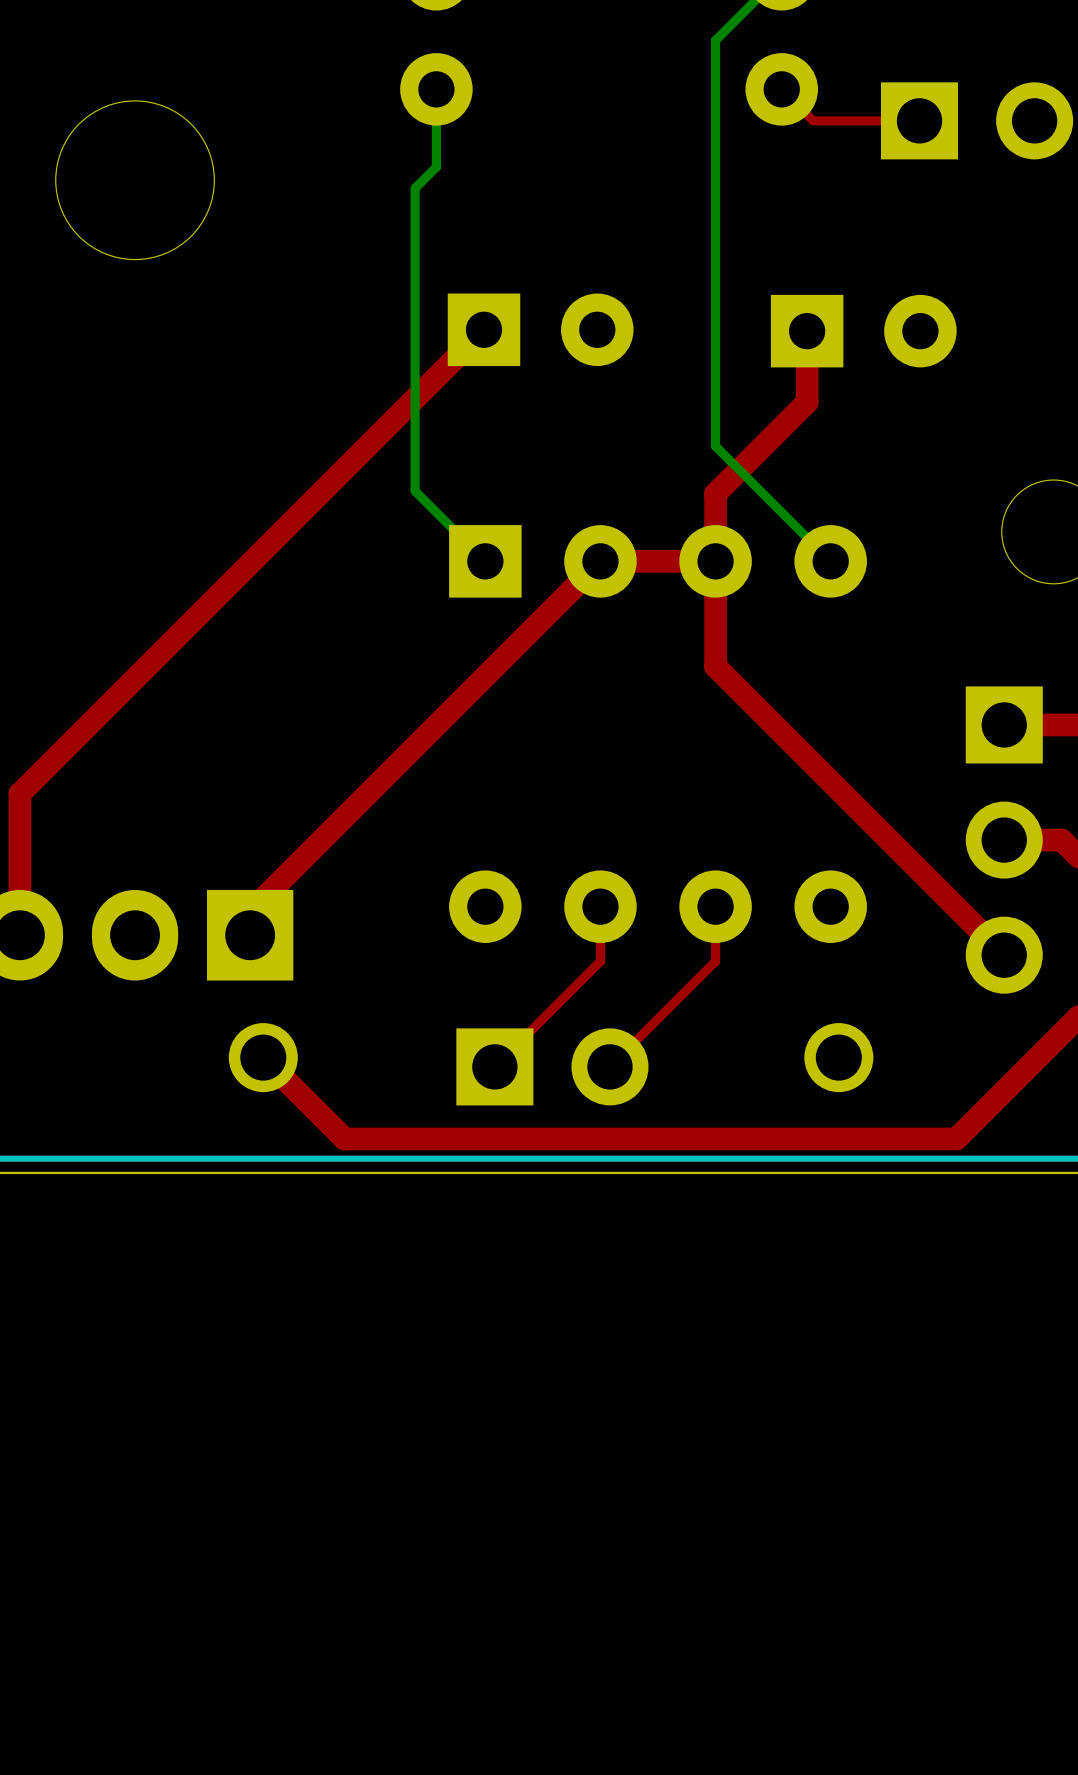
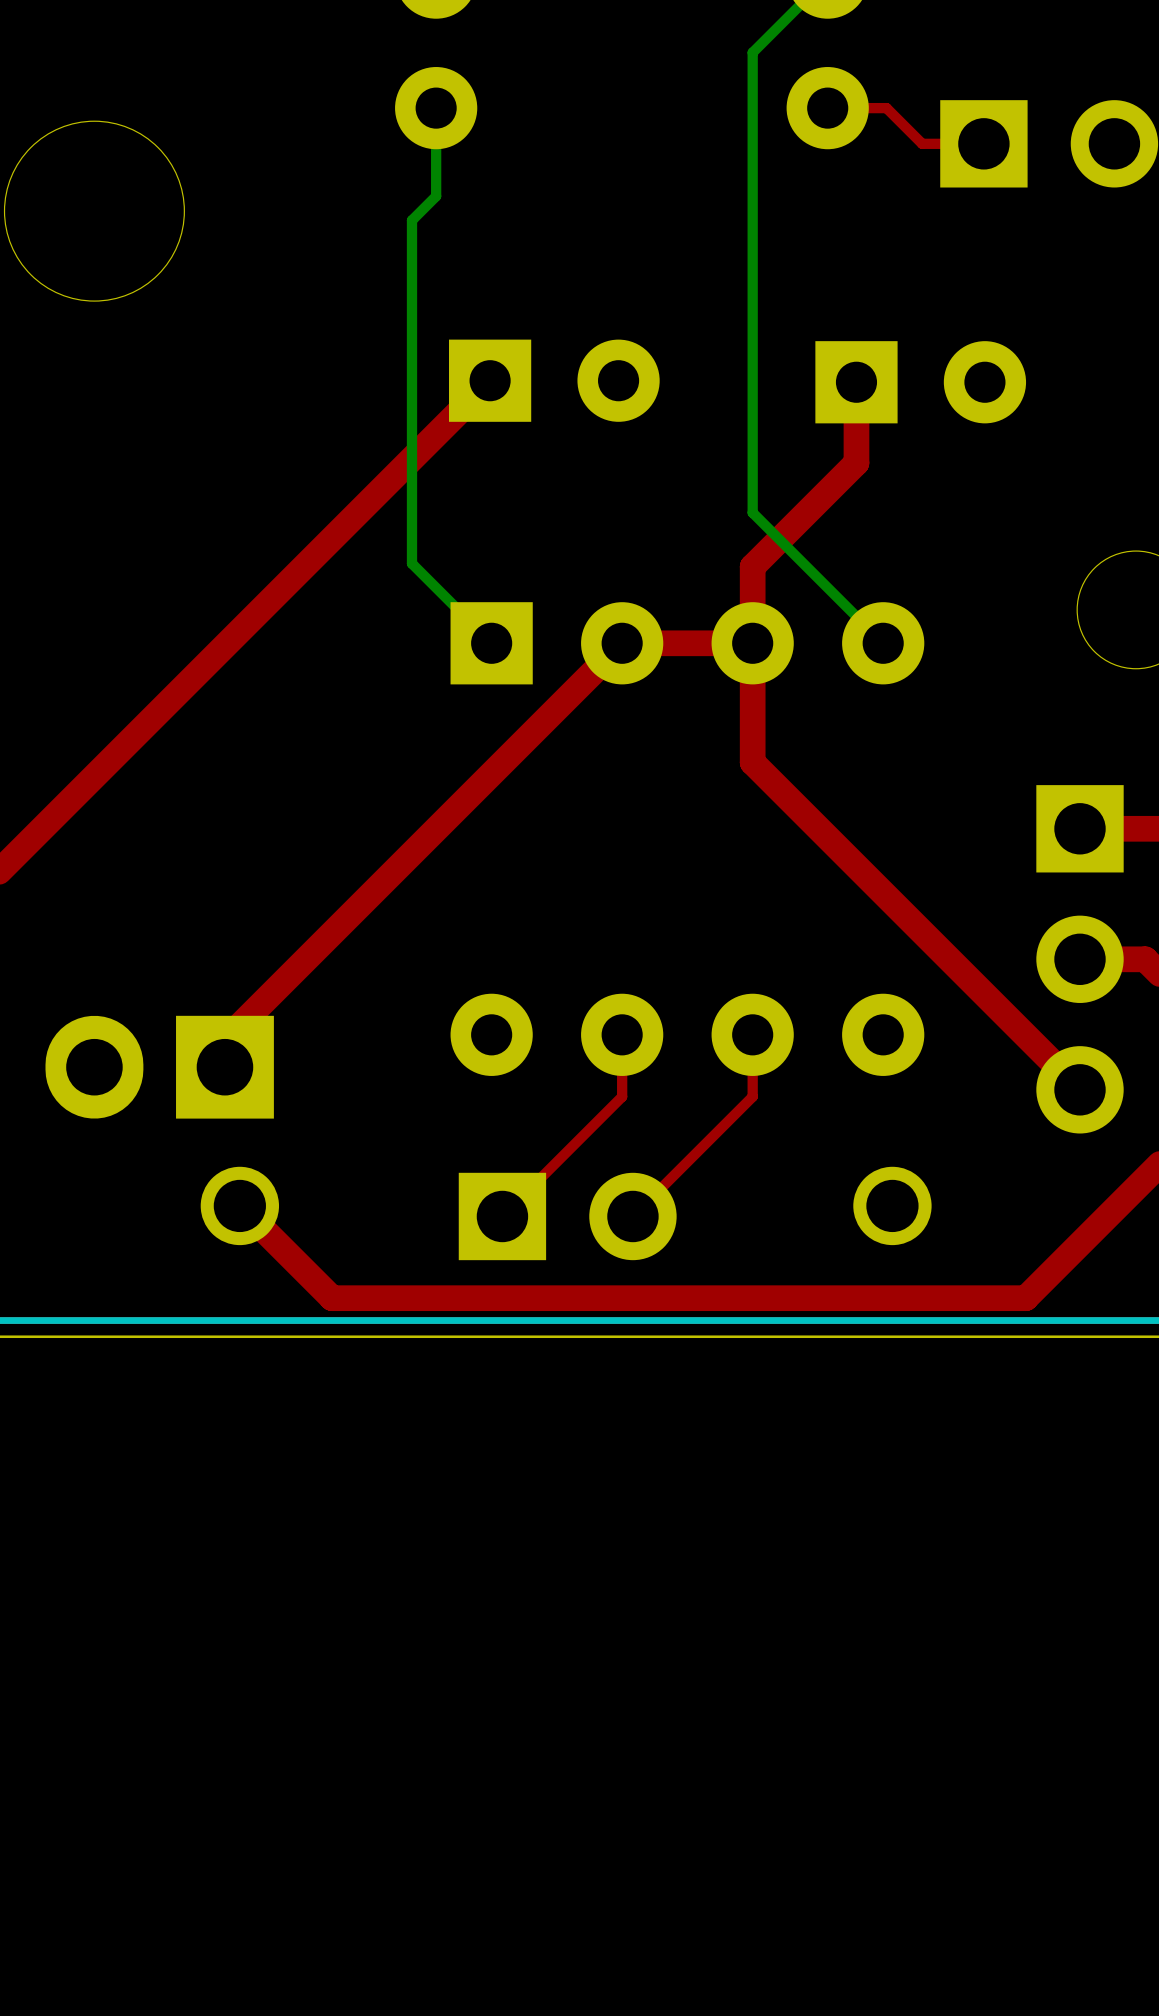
top track: (781, 89) (813, 120) (865, 120) -> (827, 108) (886, 108) (922, 143)

